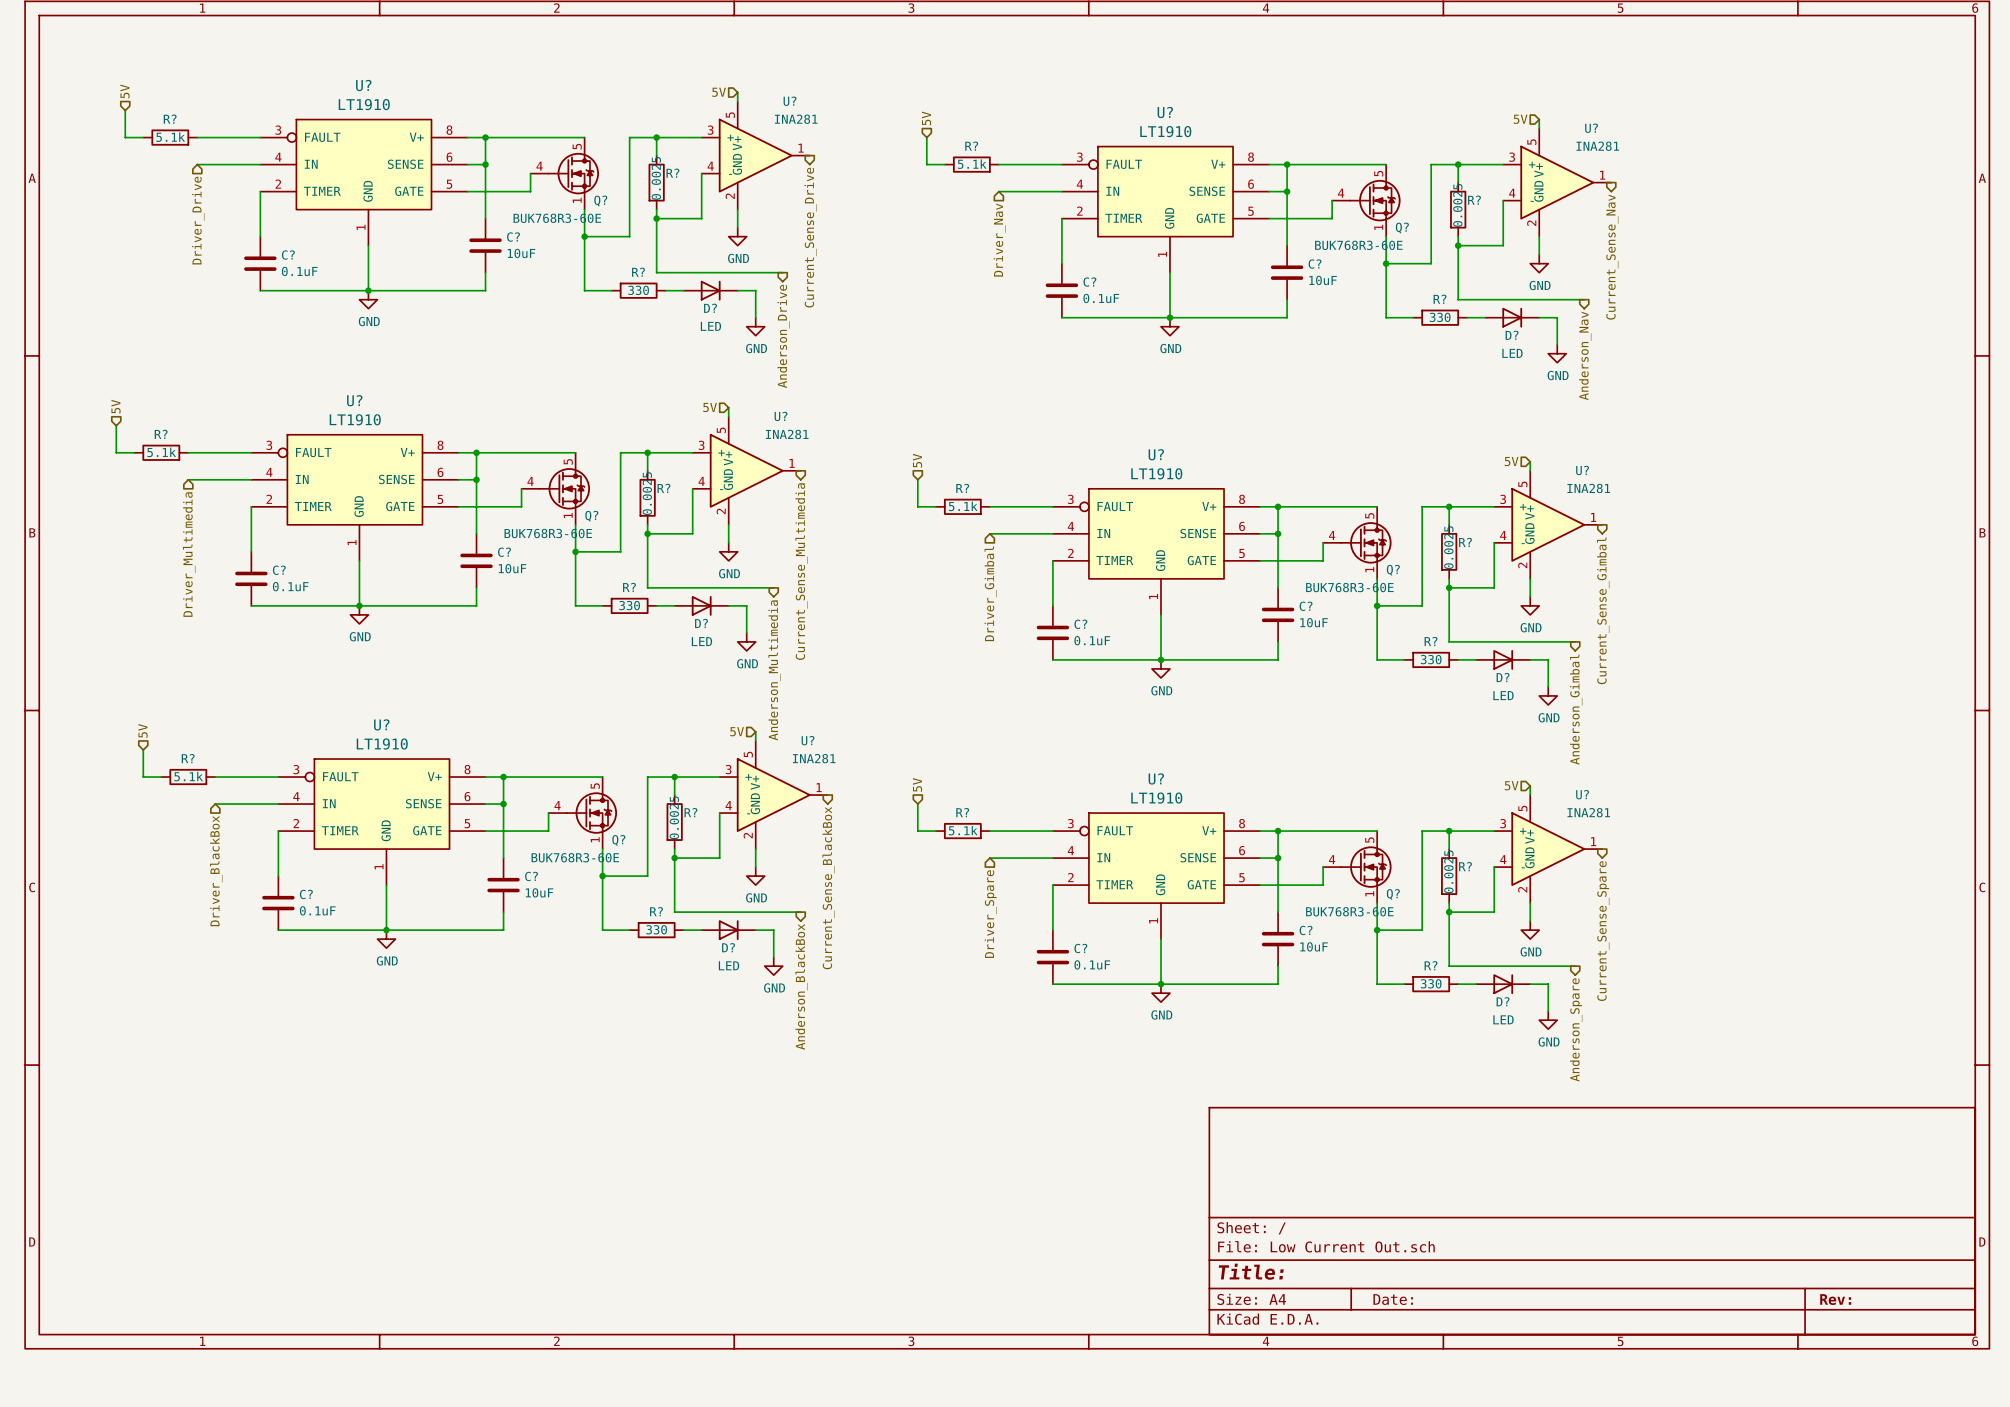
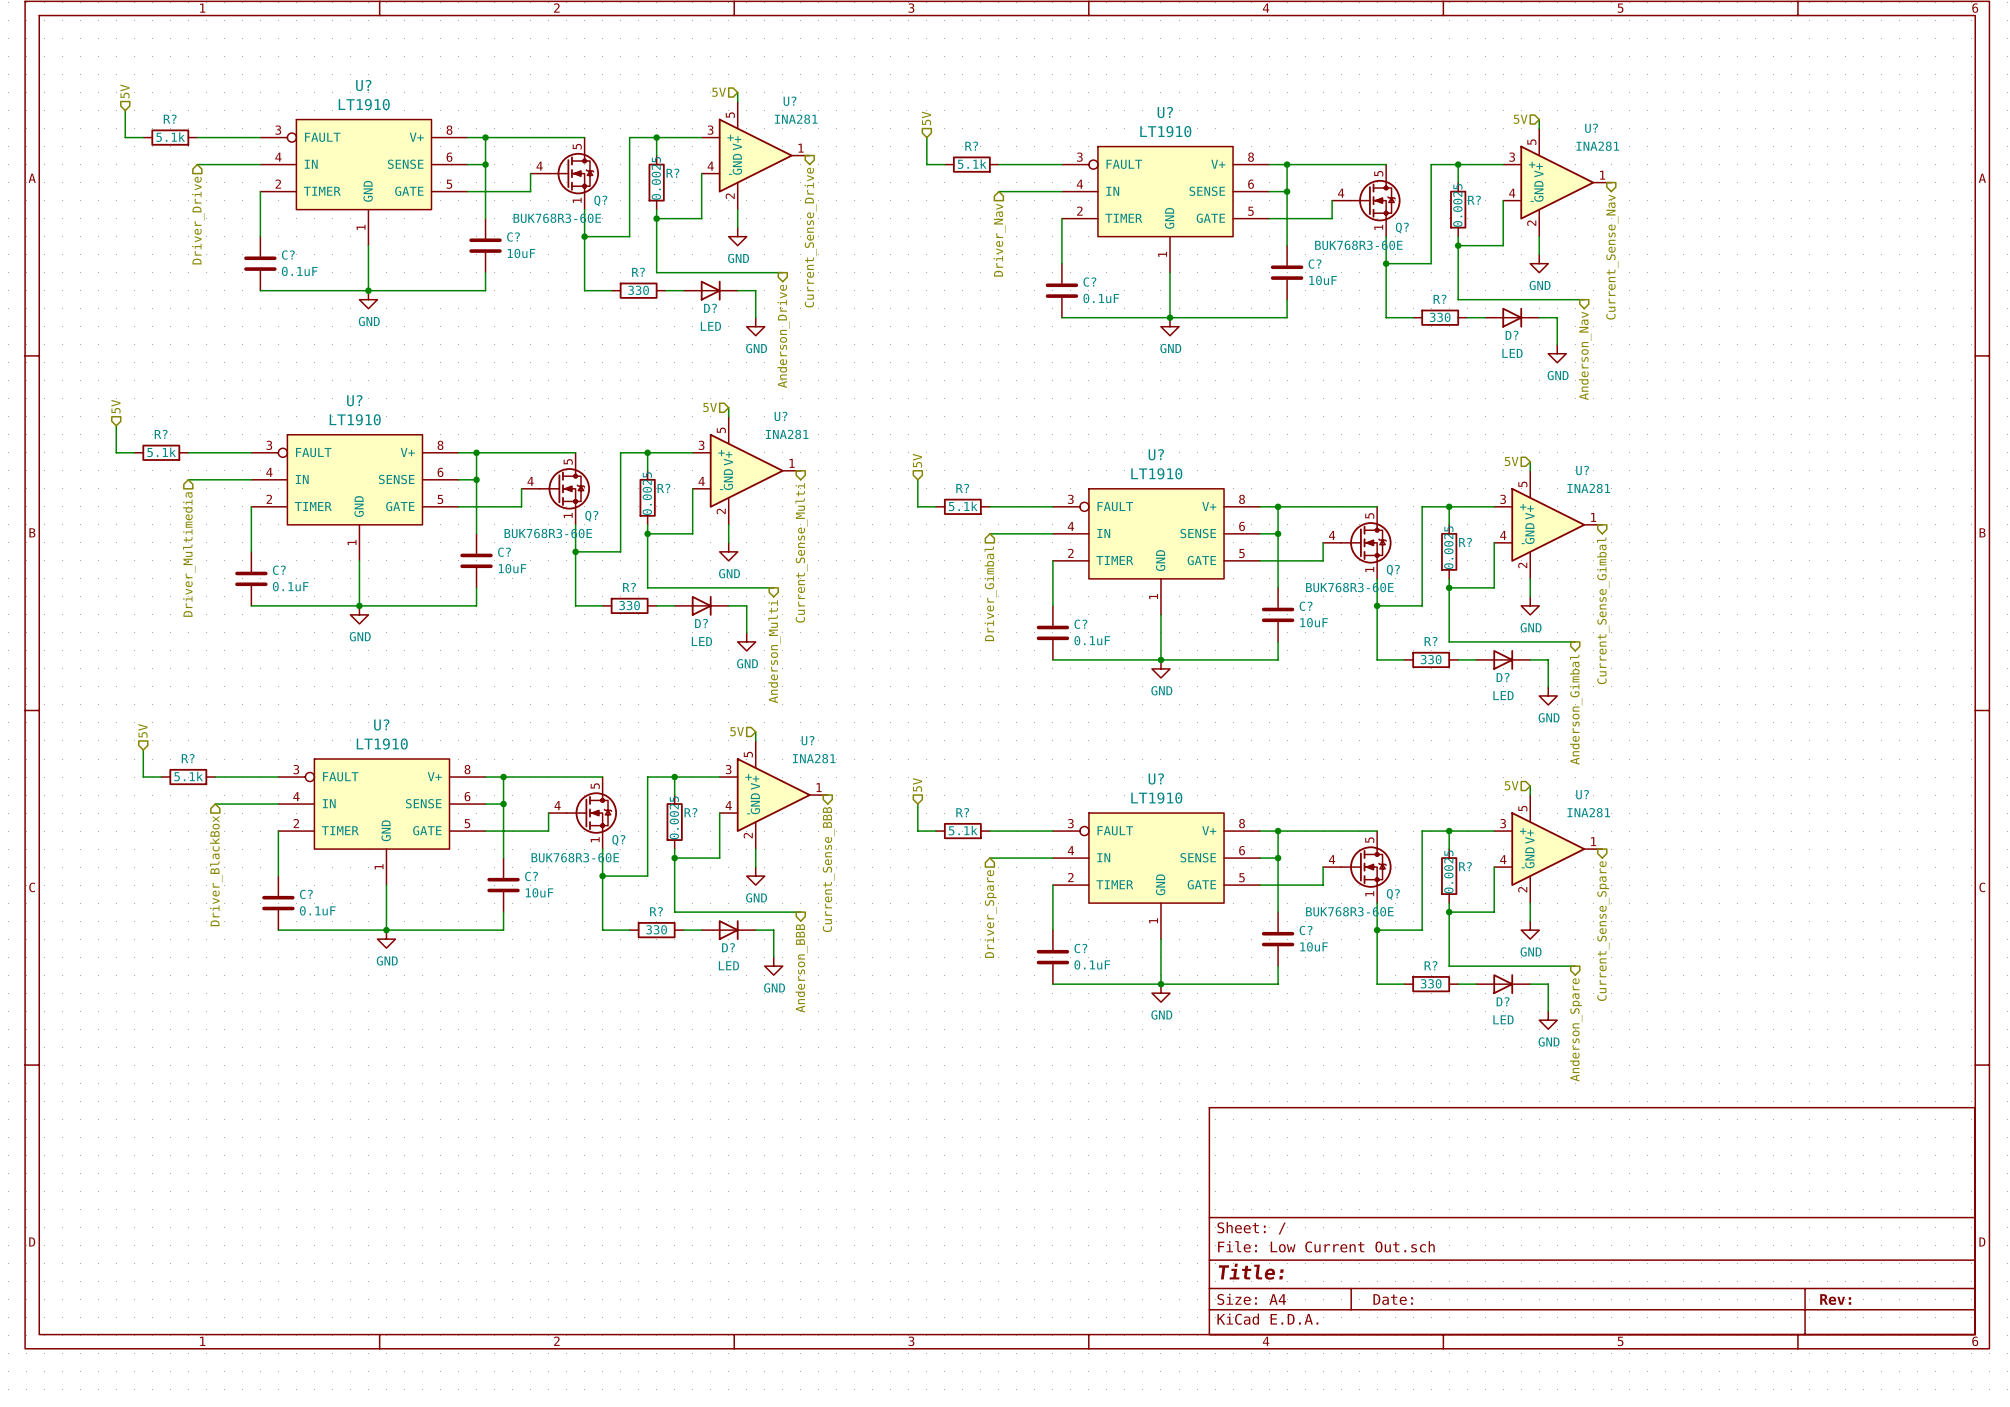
hierarchical label: Current_Sense_Multimedia (801, 571) -> Current_Sense_Multi (801, 552)
hierarchical label: Anderson_Multimedia (774, 670) -> Anderson_Multi (774, 651)
hierarchical label: Current_Sense_BlackBox (828, 888) -> Current_Sense_BBB (828, 869)
hierarchical label: Anderson_BlackBox (801, 986) -> Anderson_BBB (801, 968)

